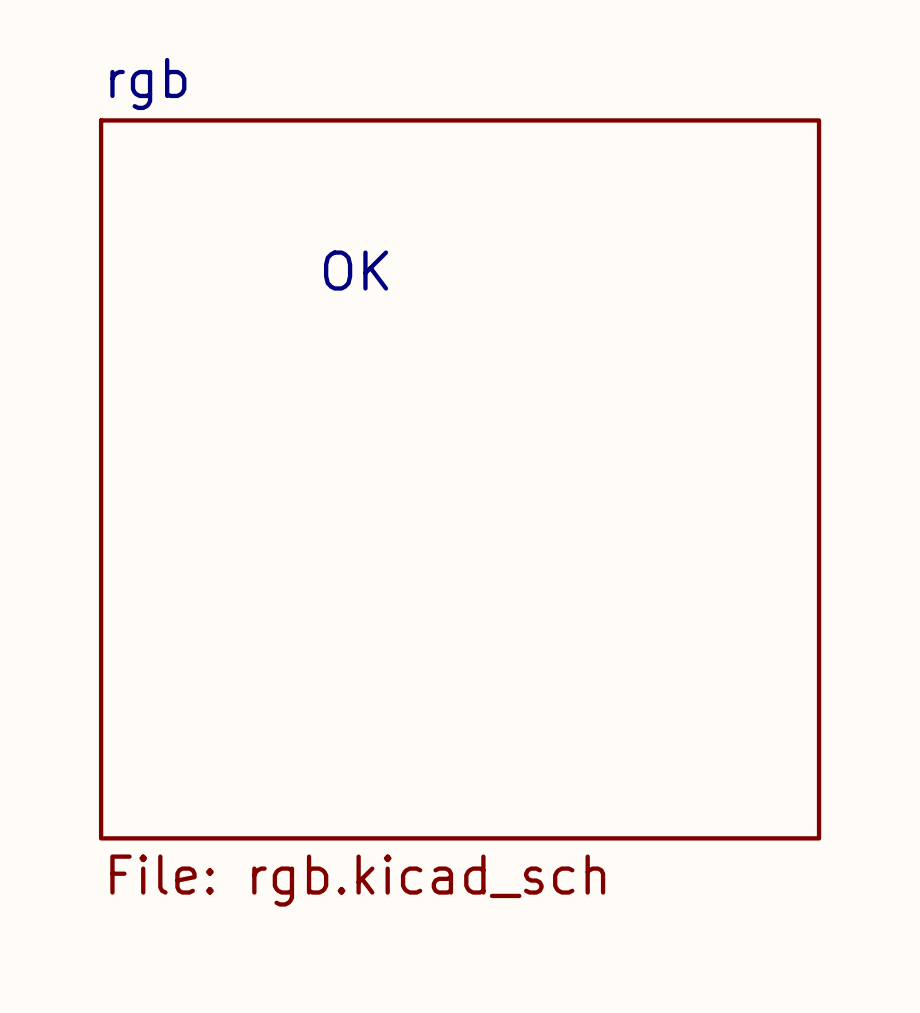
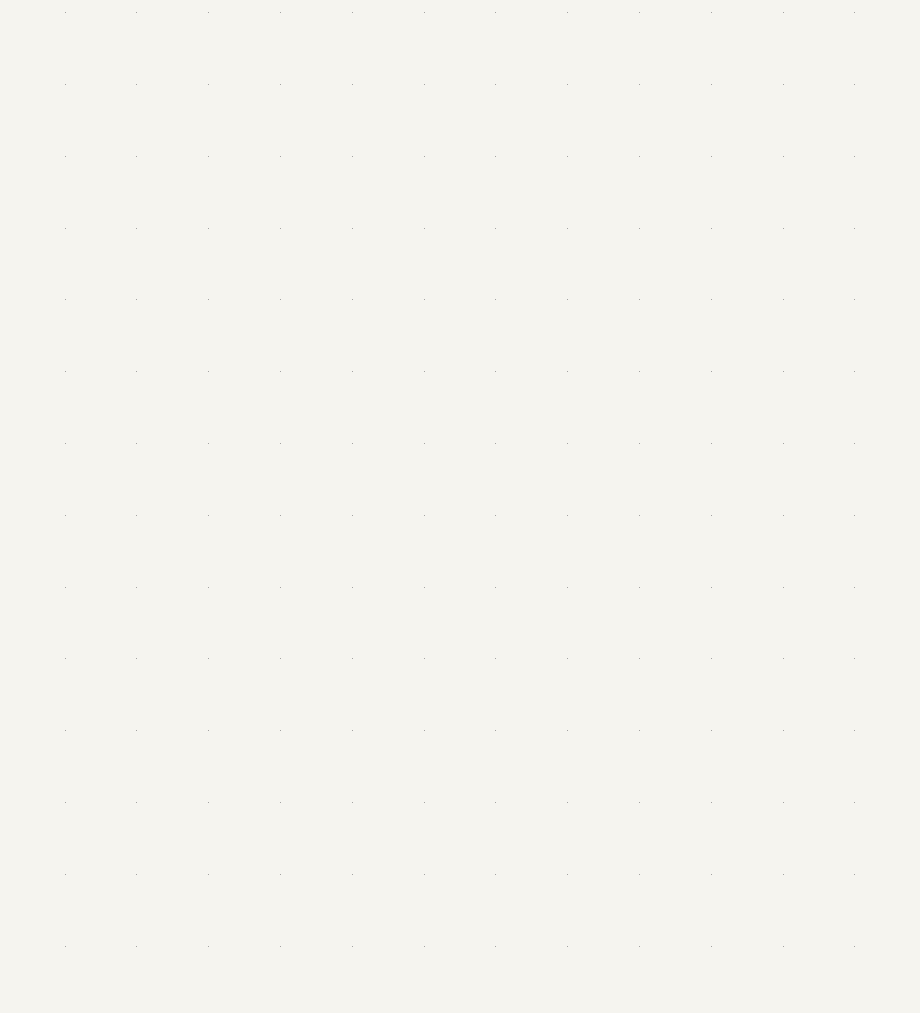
text: OK (356, 270) -> none
sheet rgb: File: rgb.kicad_sch (460, 479) -> none

